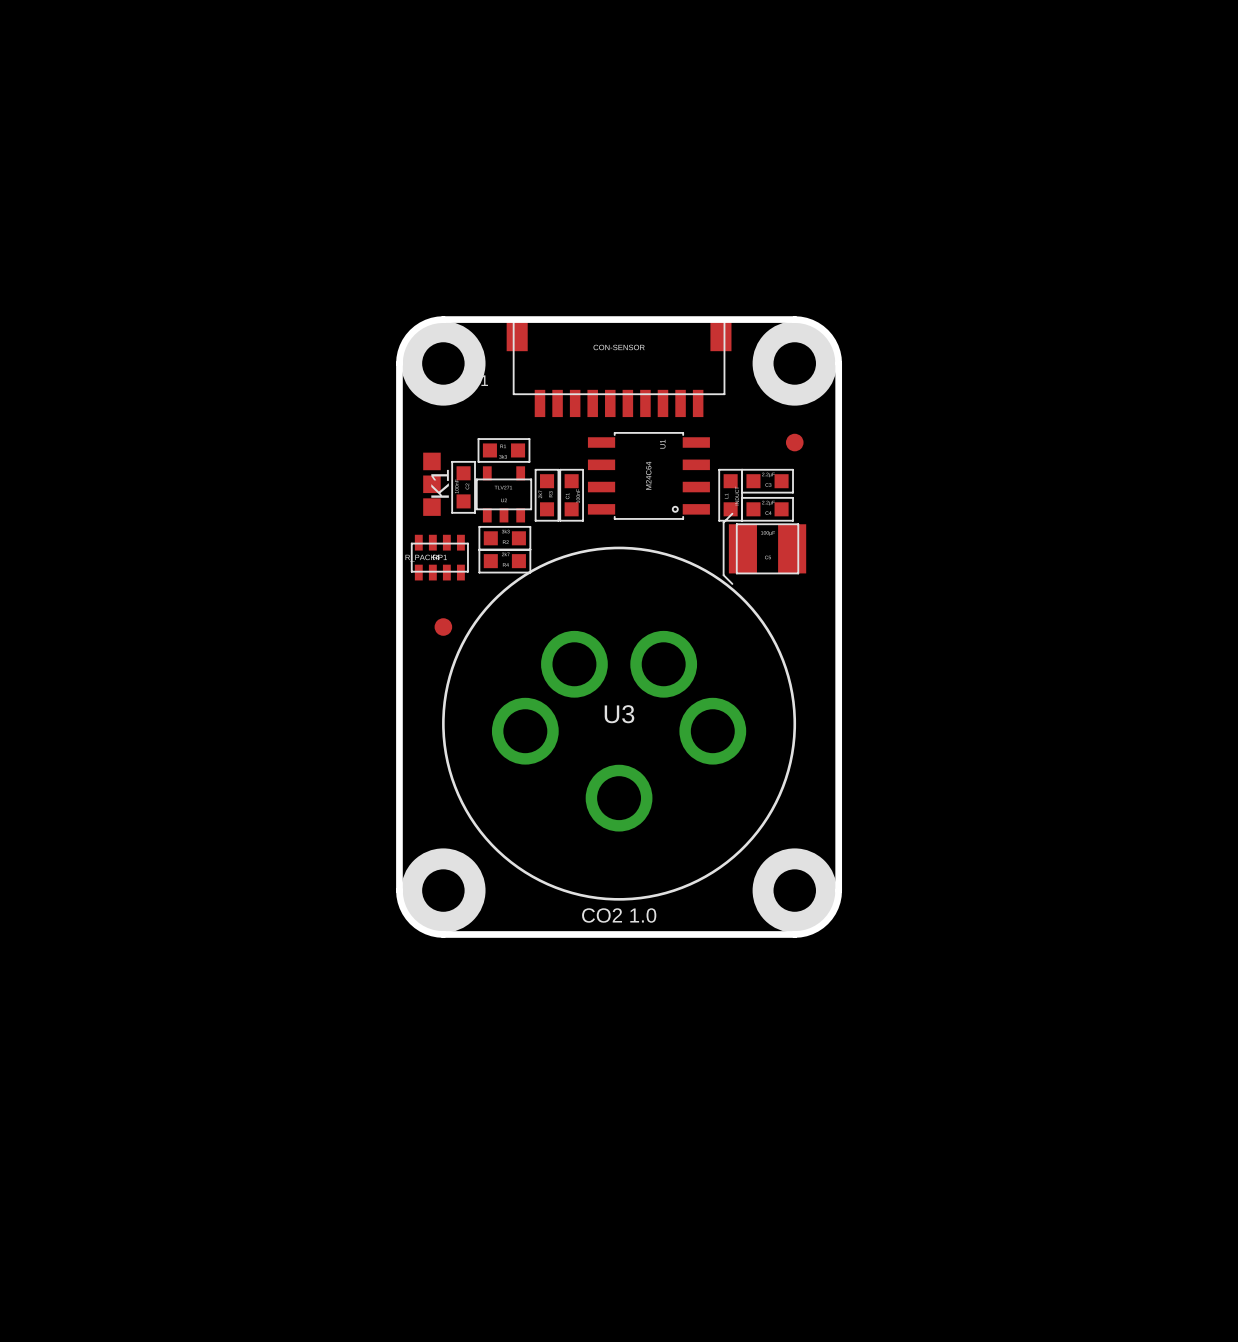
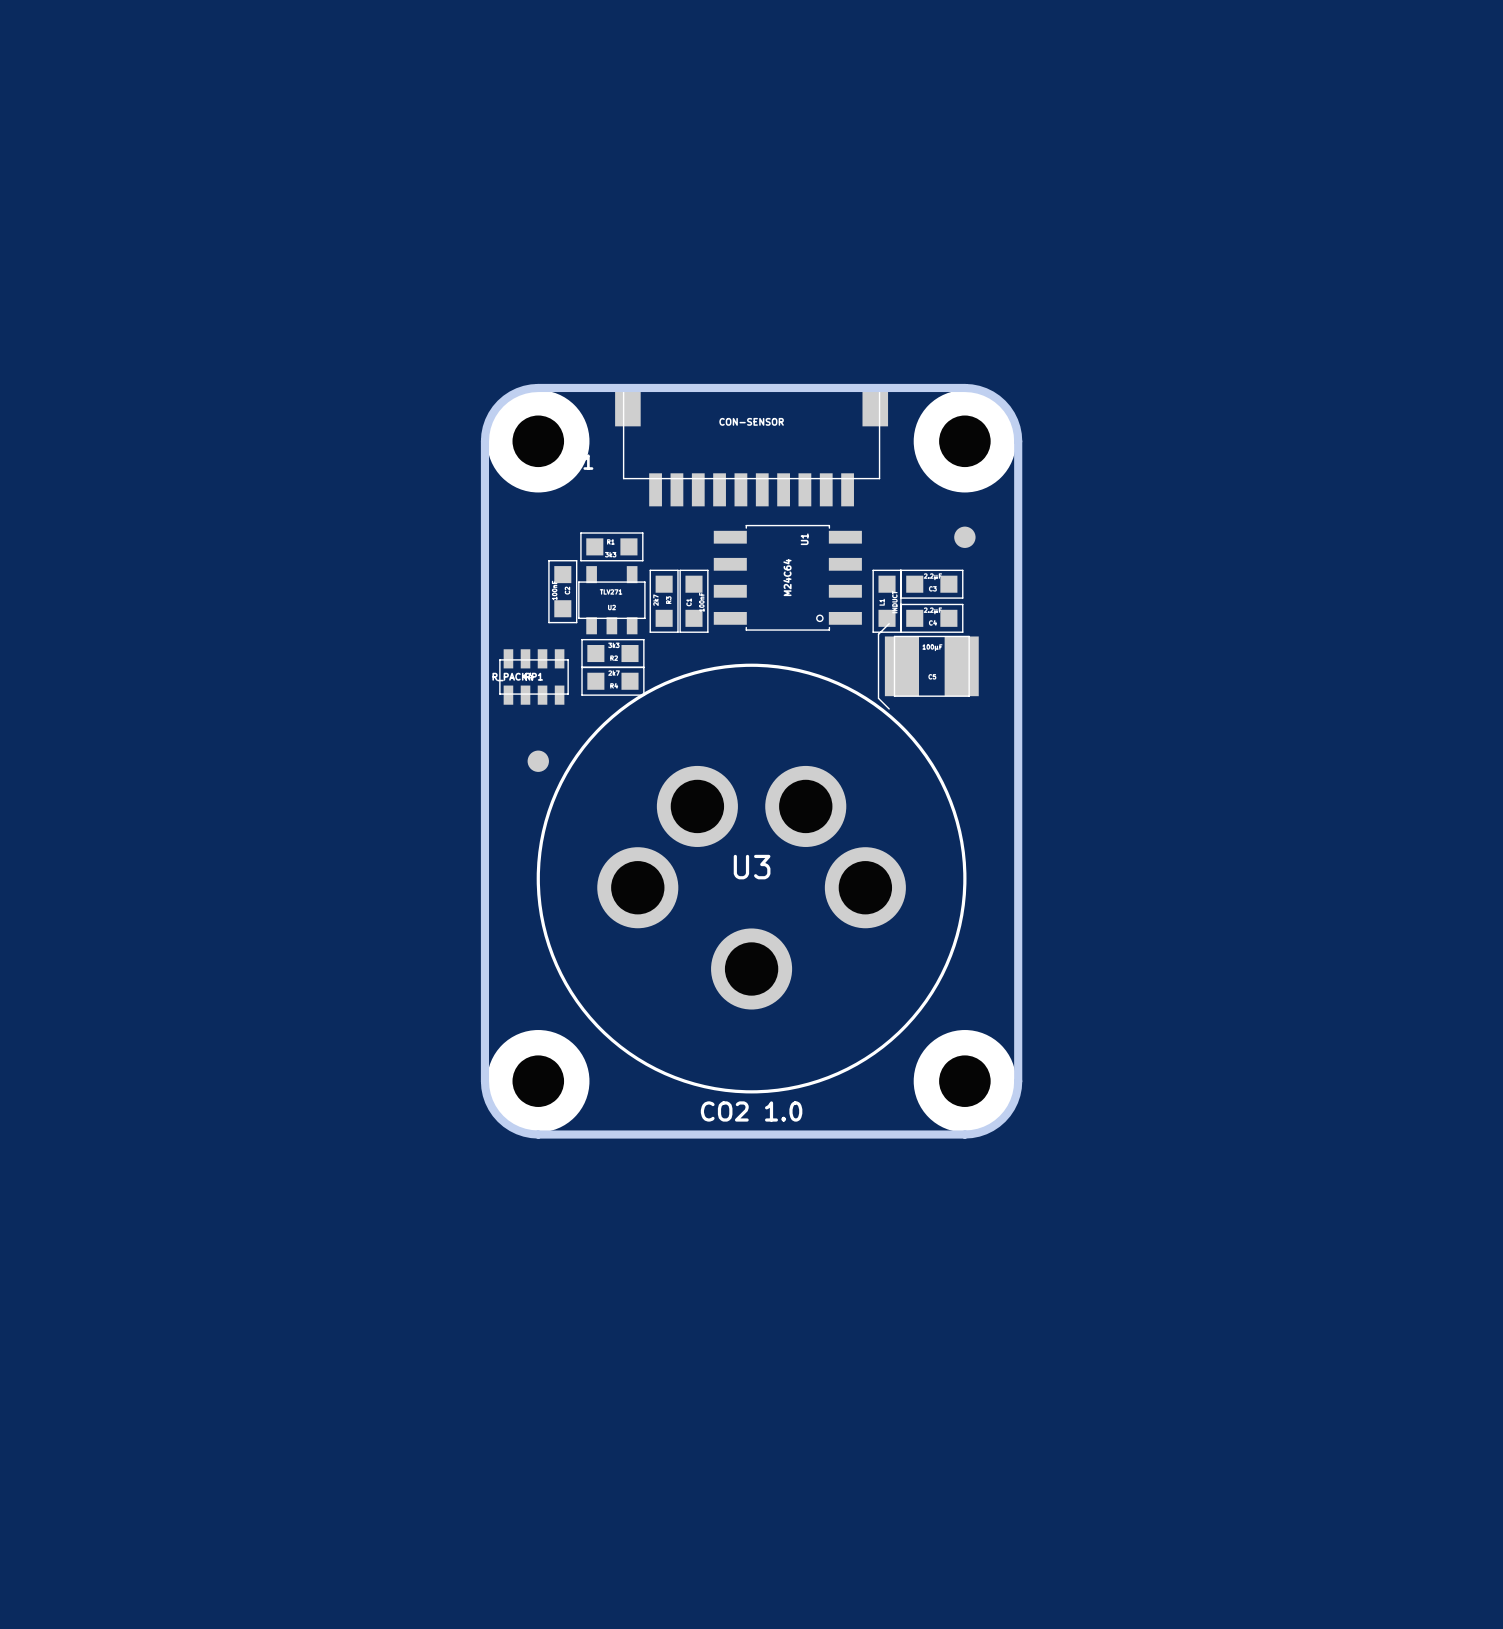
K1: (431, 484) -> none

